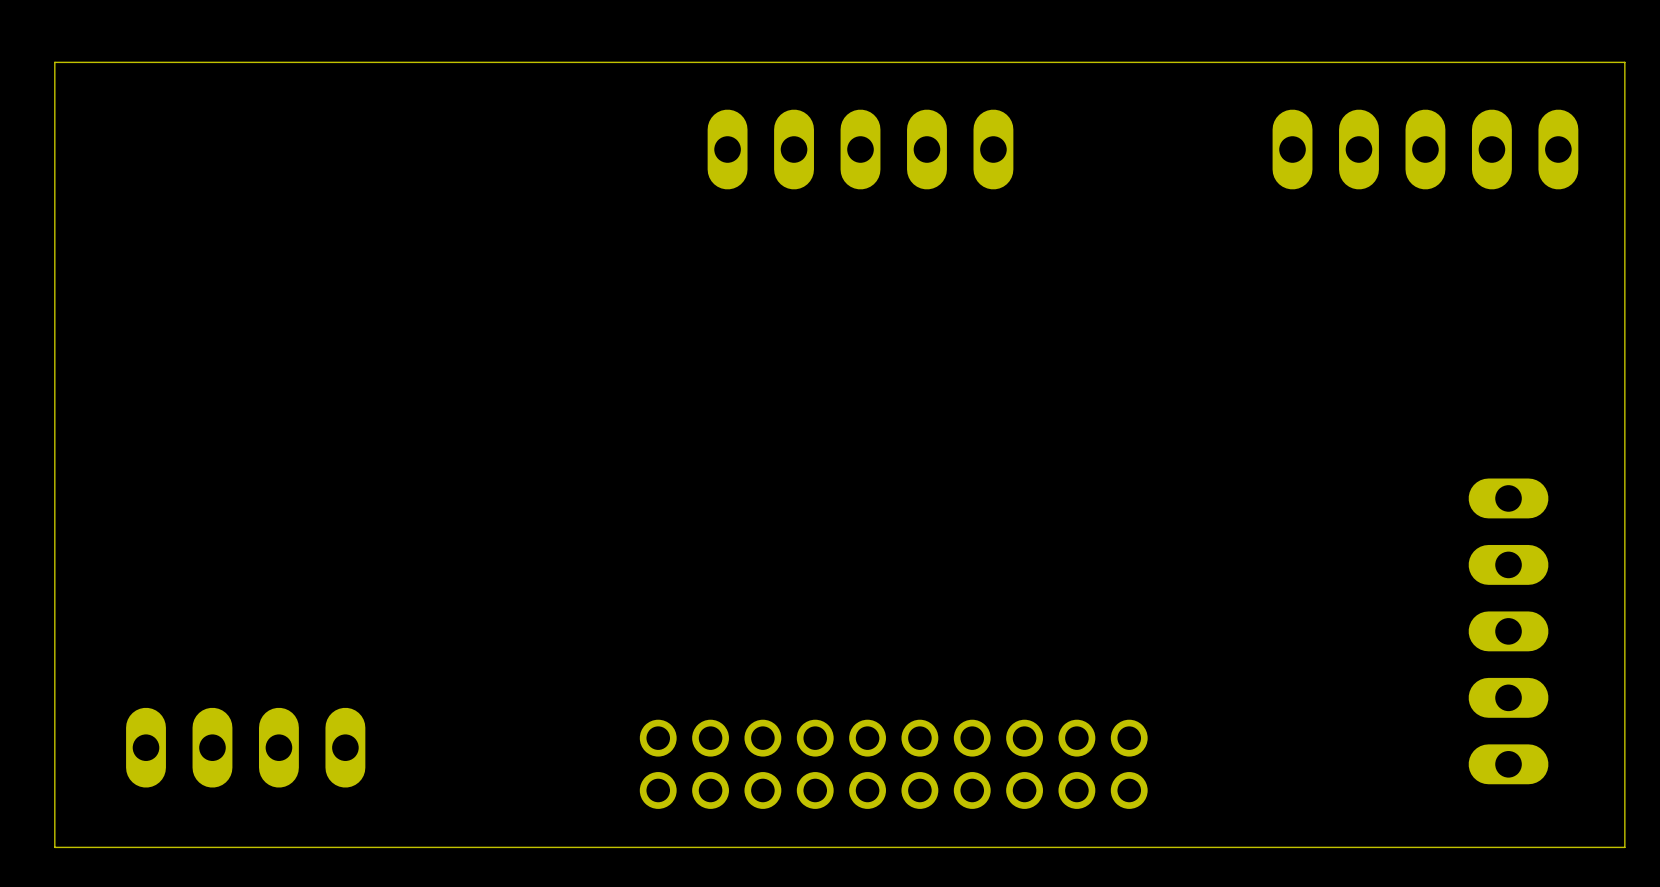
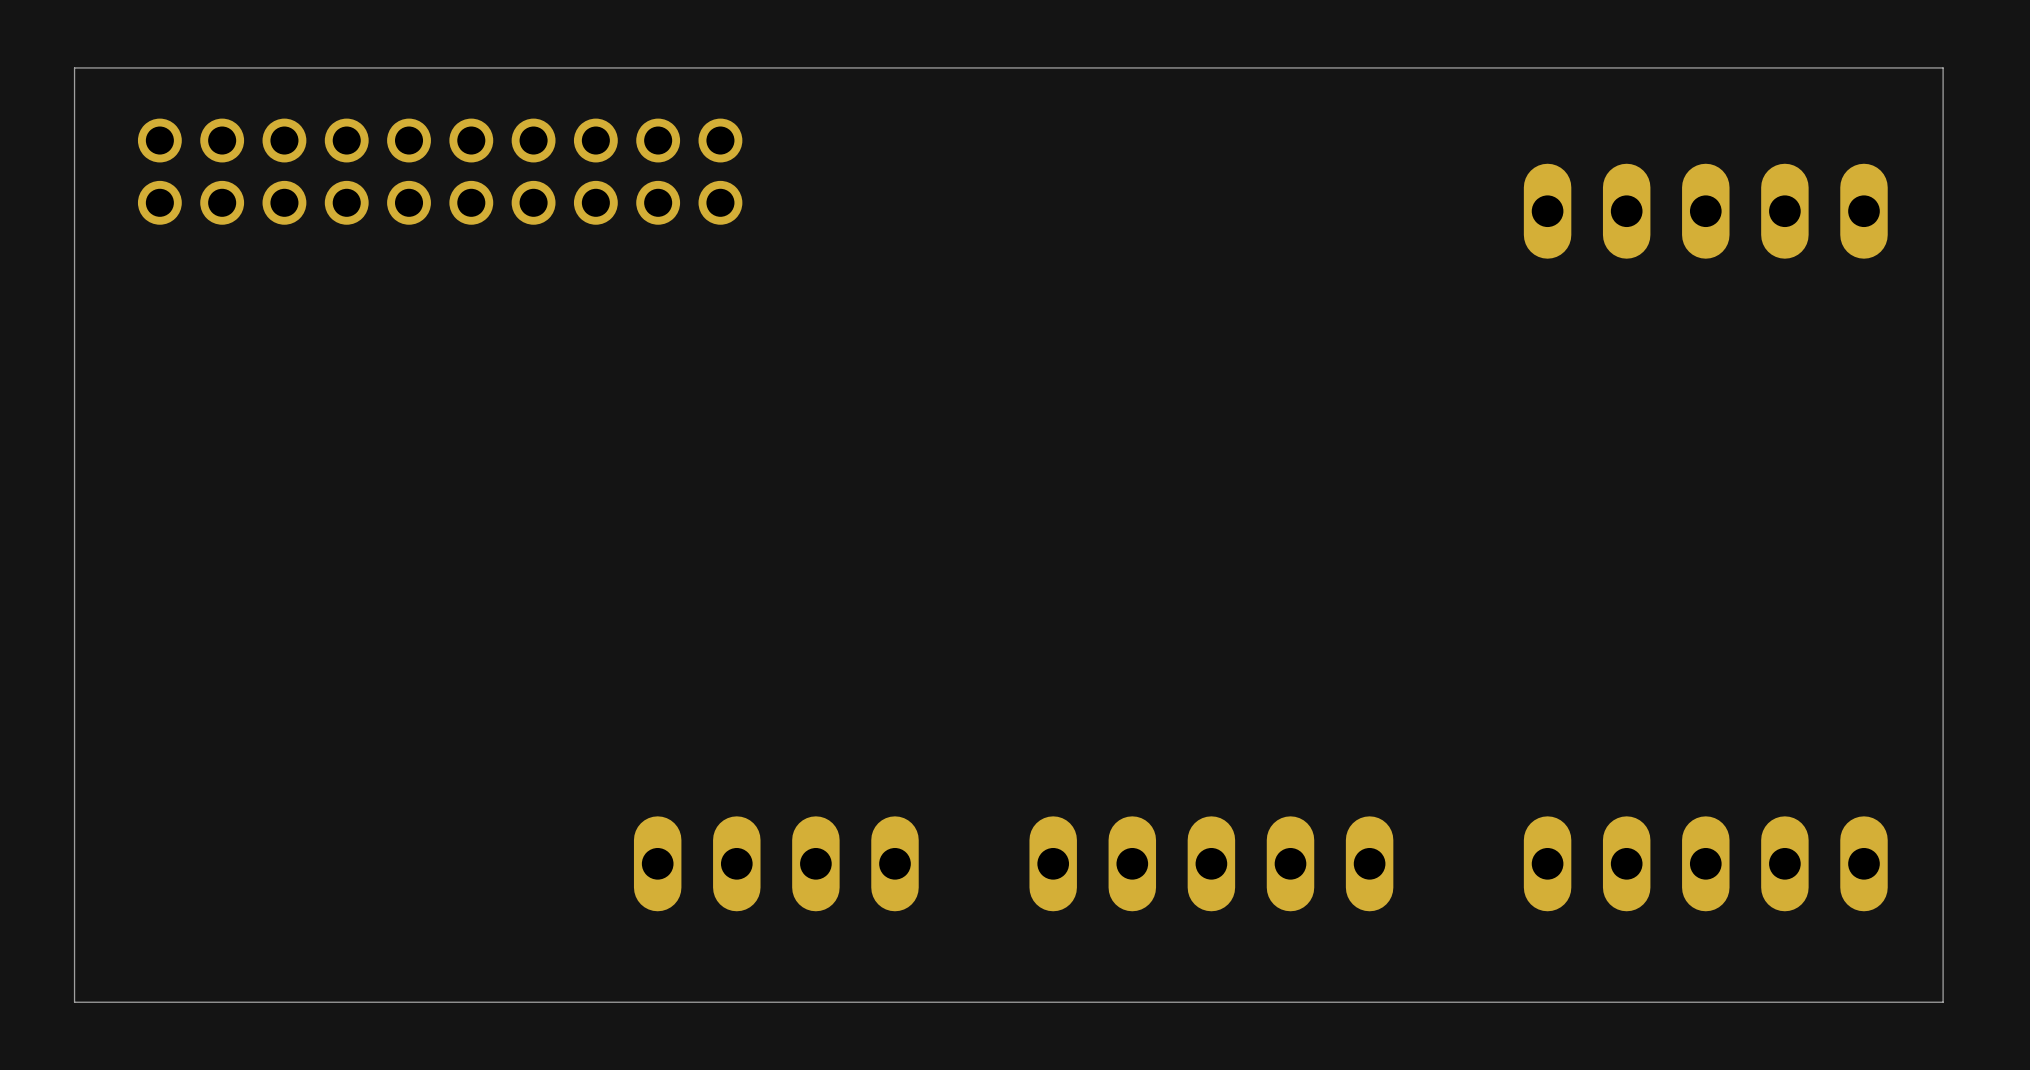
part: none -> (440, 171)
part: (860, 149) -> none
part position: (1425, 149) -> (1705, 211)
part rotation: 0° (1508, 631) -> 90° clockwise (1705, 863)
part: none -> (1211, 863)
part position: (245, 747) -> (776, 863)
part: (893, 764) -> none

